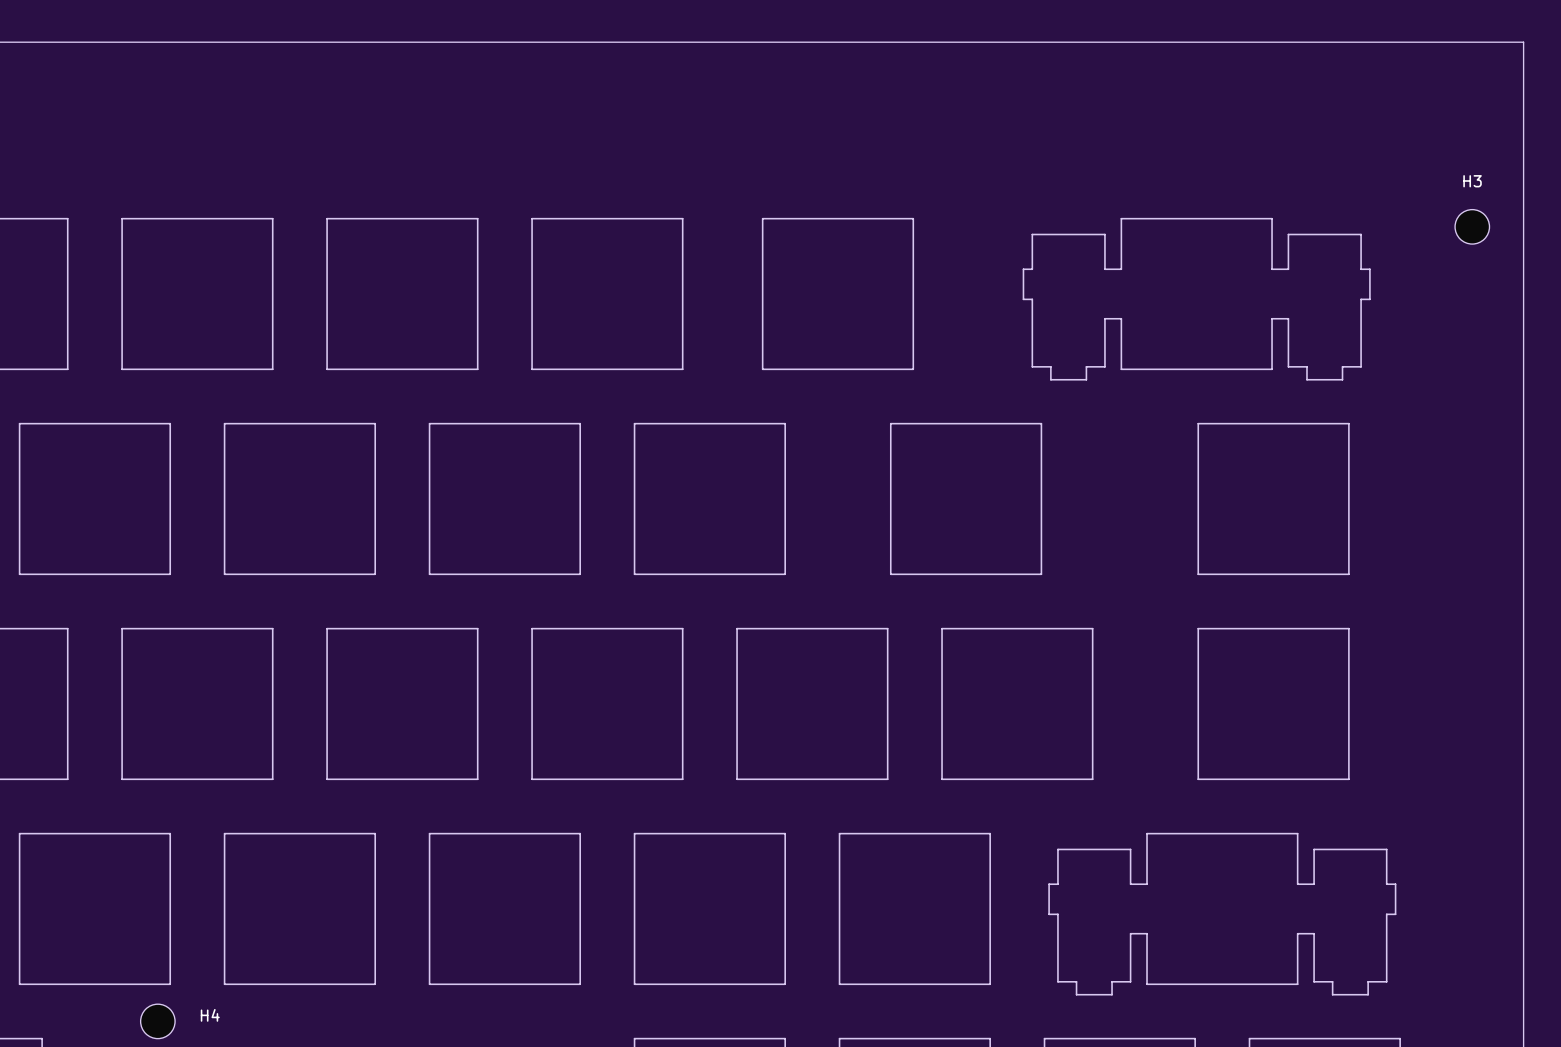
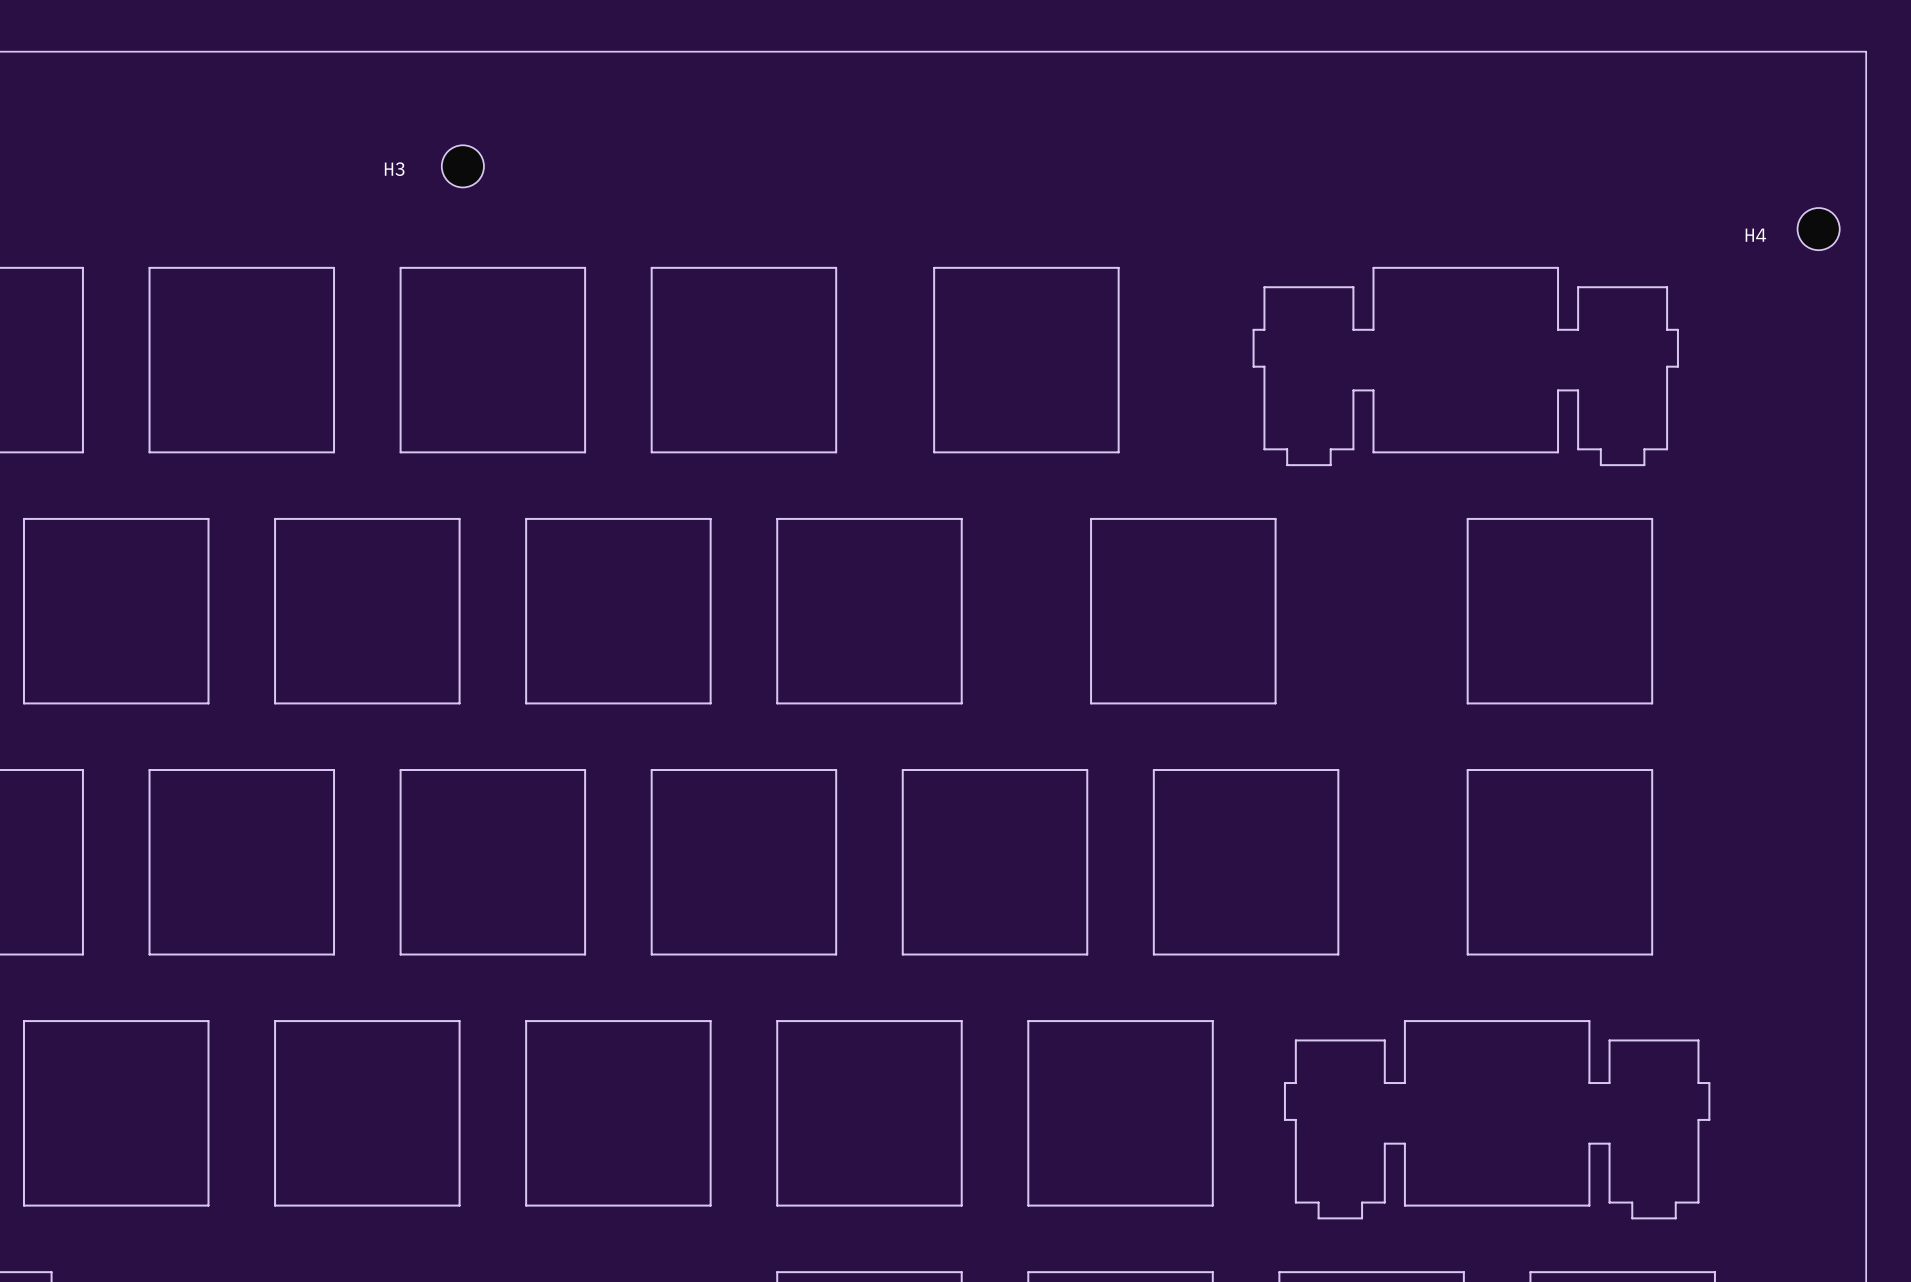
H3 name position: H3 (1472, 181) -> H3 (394, 169)
H3 position: (1472, 226) -> (462, 166)
H4 name position: H4 (210, 1015) -> H4 (1755, 235)
H4 position: (157, 1021) -> (1818, 229)

